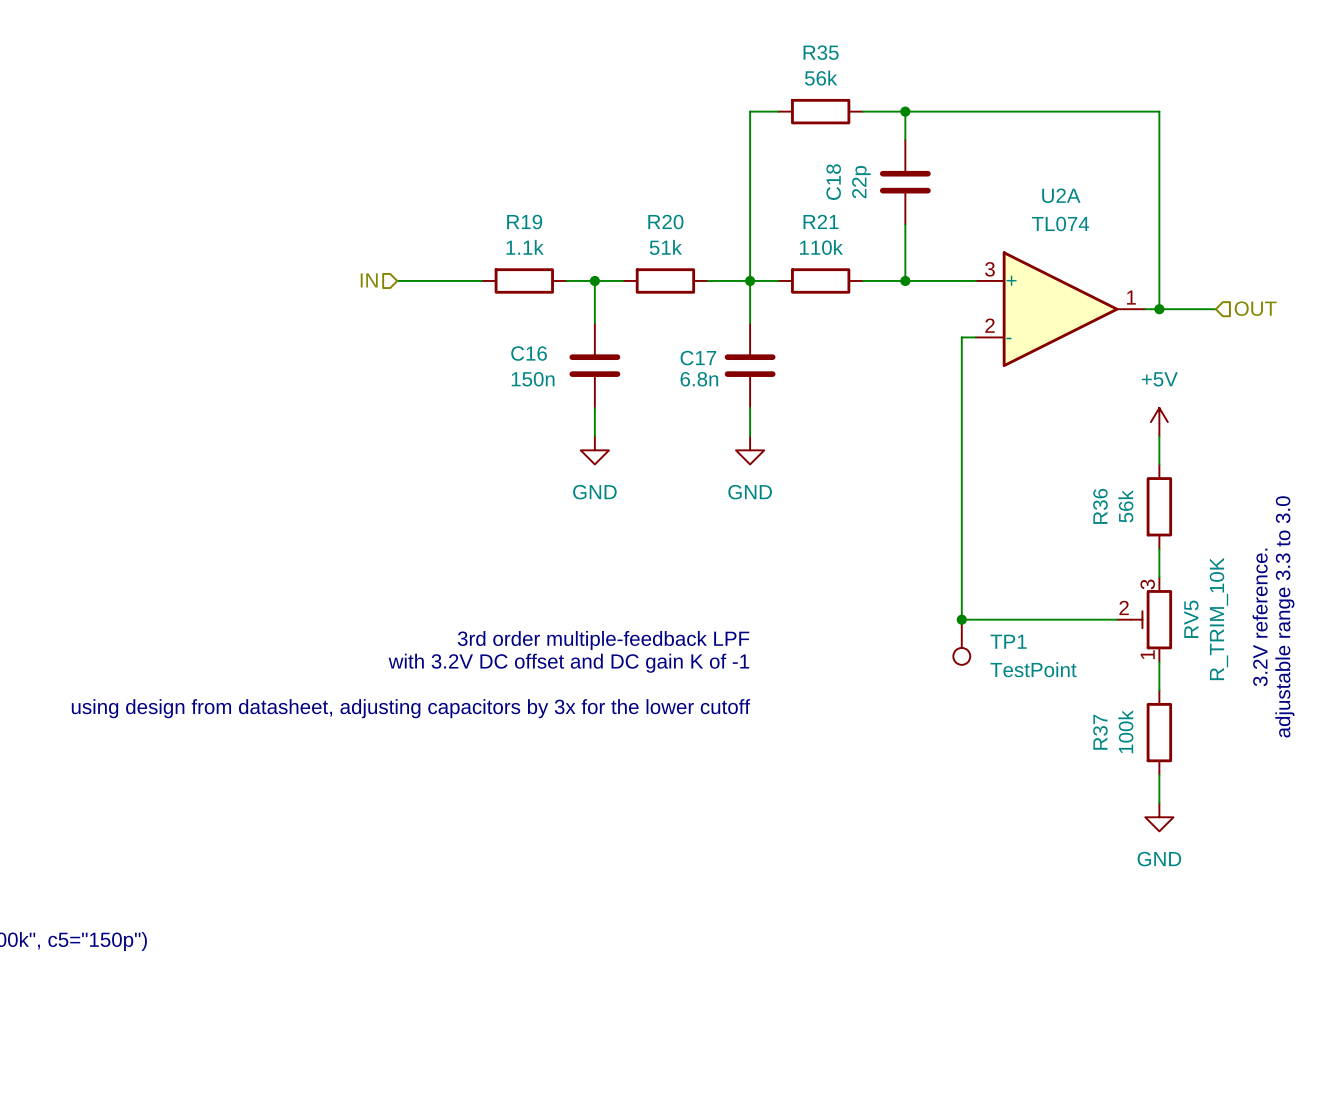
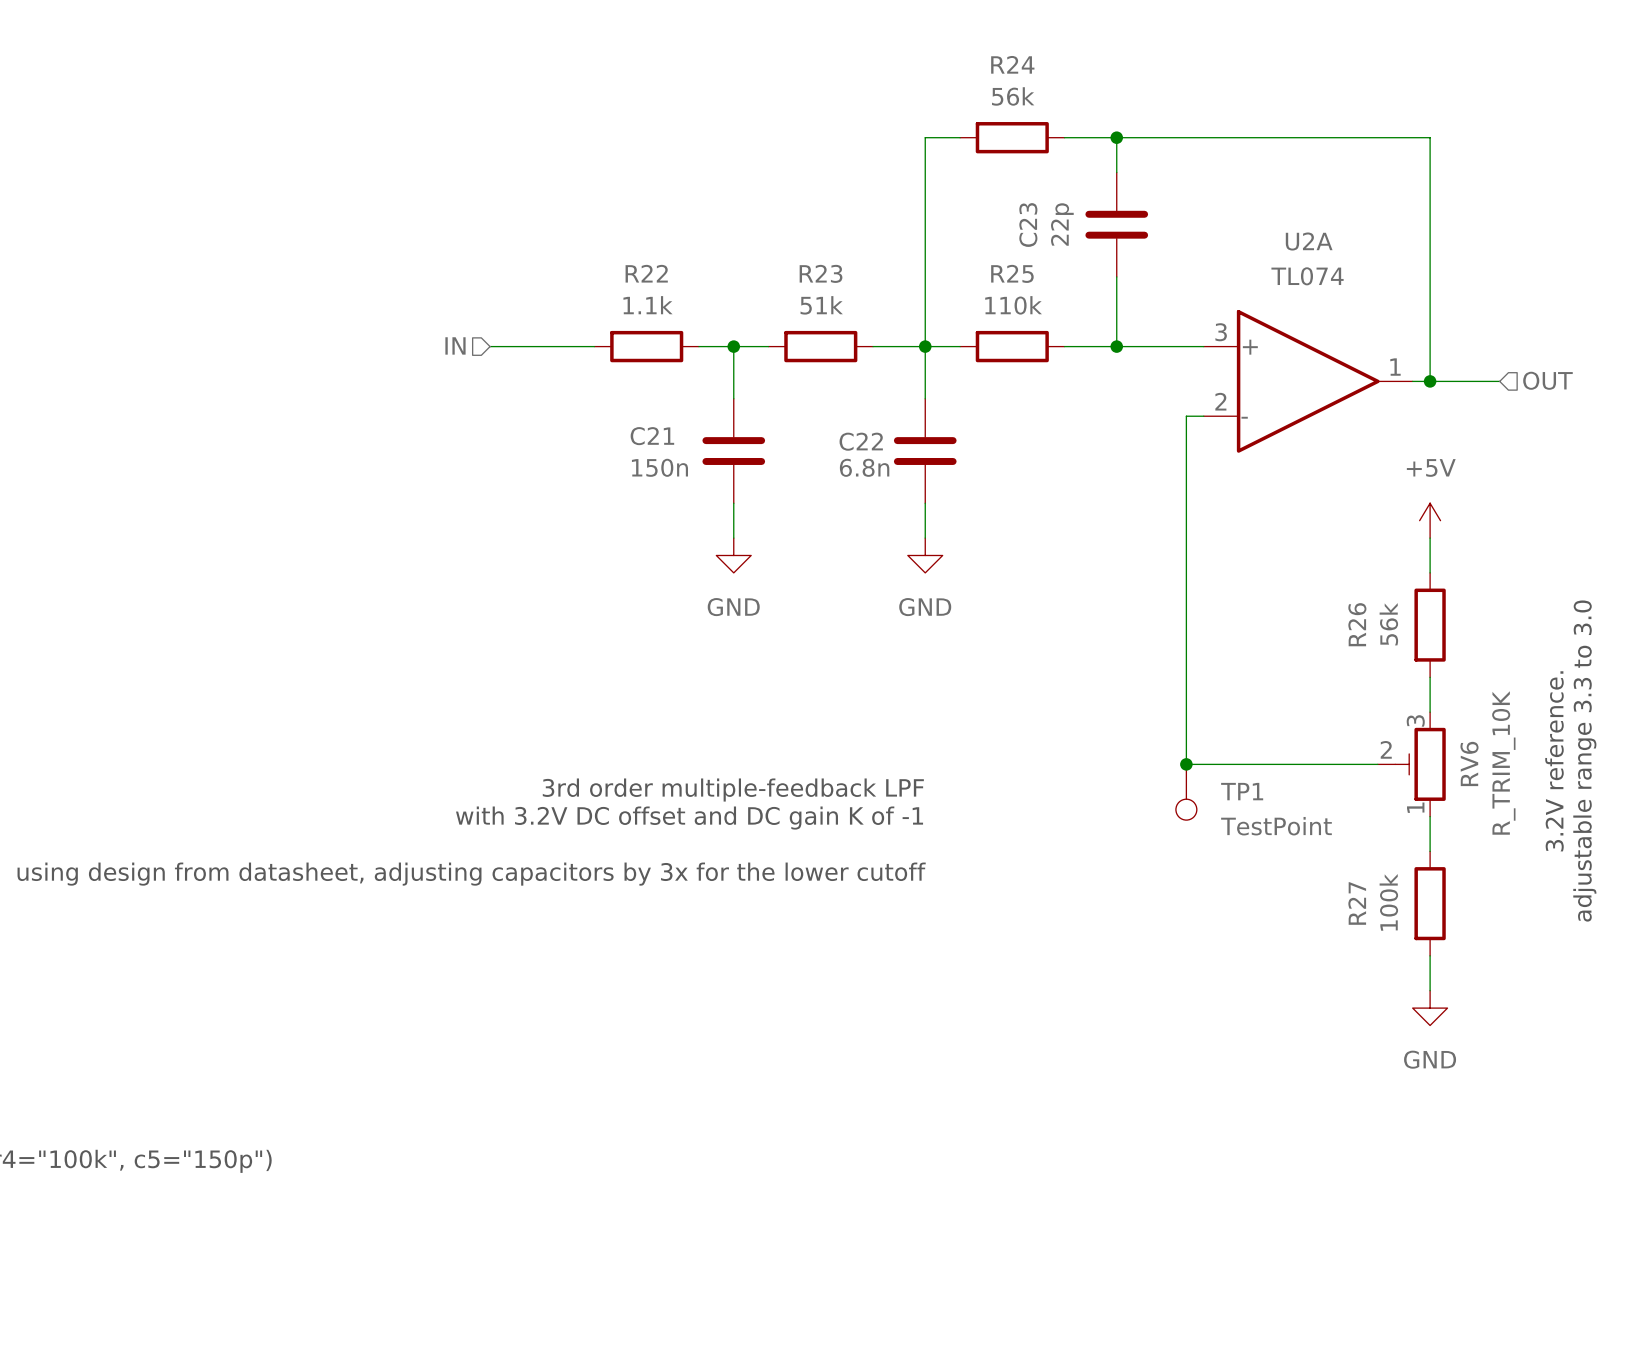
R35 name: R35 (821, 52) -> R24 (1012, 64)
C18 name: C18 (833, 182) -> C23 (1028, 225)
R21 name: R21 (821, 221) -> R25 (1012, 273)
R19 name: R19 (524, 222) -> R22 (646, 273)
R20 name: R20 (665, 222) -> R23 (821, 273)
C16 name: C16 (529, 353) -> C21 (652, 436)
C17 name: C17 (698, 358) -> C22 (861, 441)
R36 name: R36 (1100, 506) -> R26 (1357, 624)
RV5 name: RV5 (1191, 619) -> RV6 (1469, 763)
R37 name: R37 (1100, 732) -> R27 (1357, 903)

